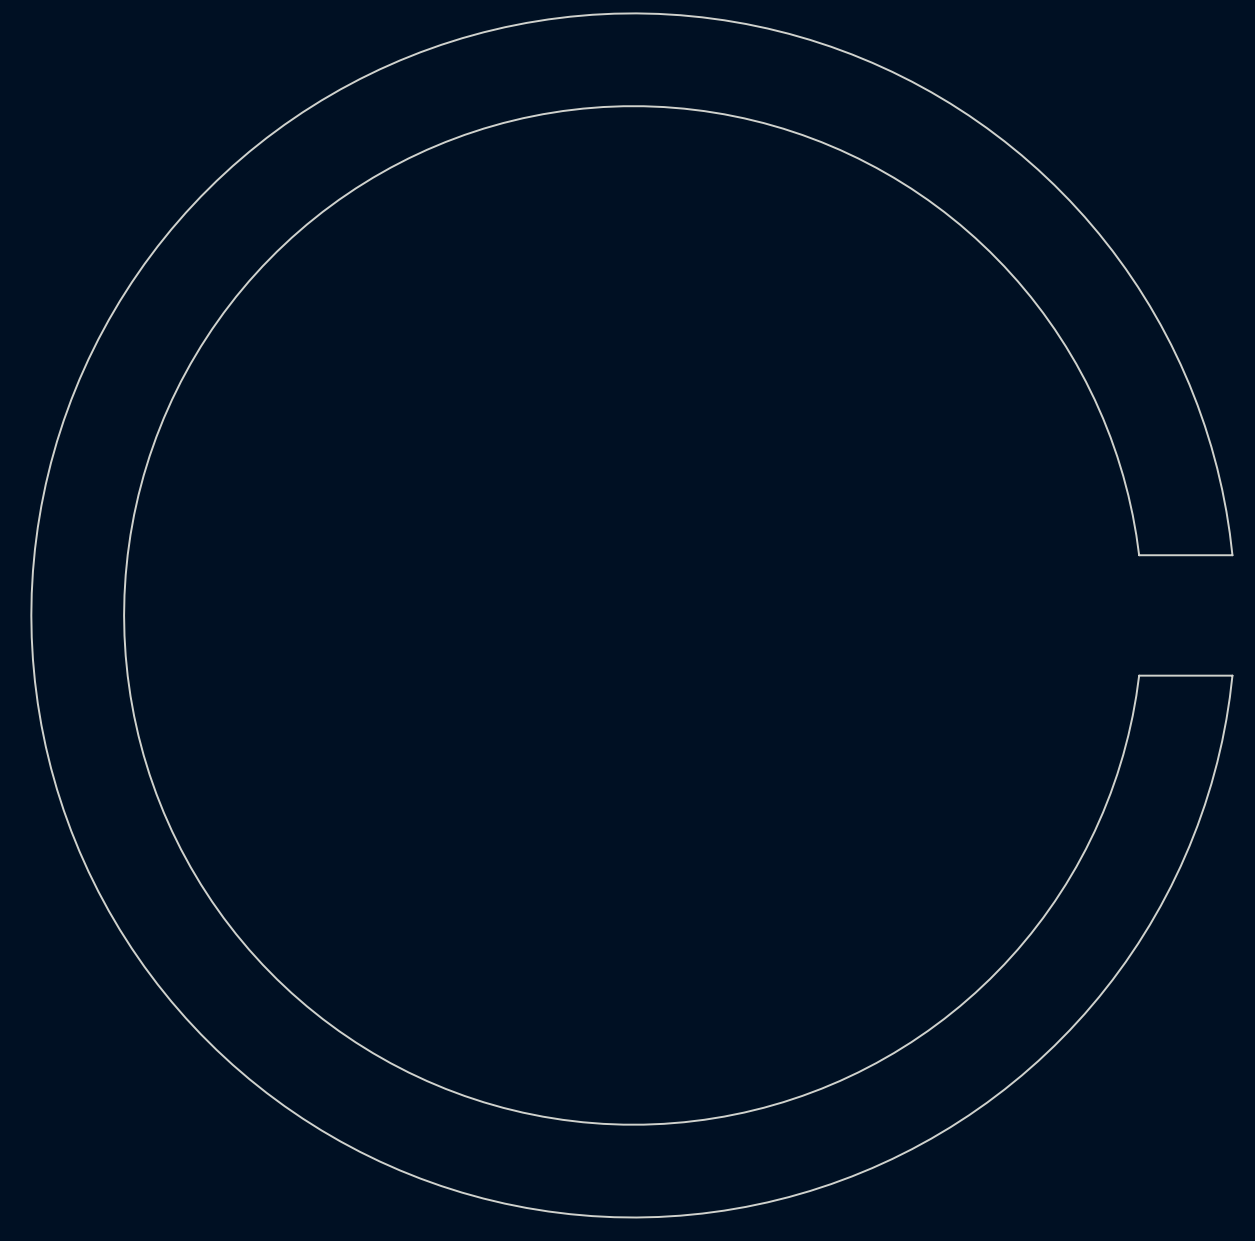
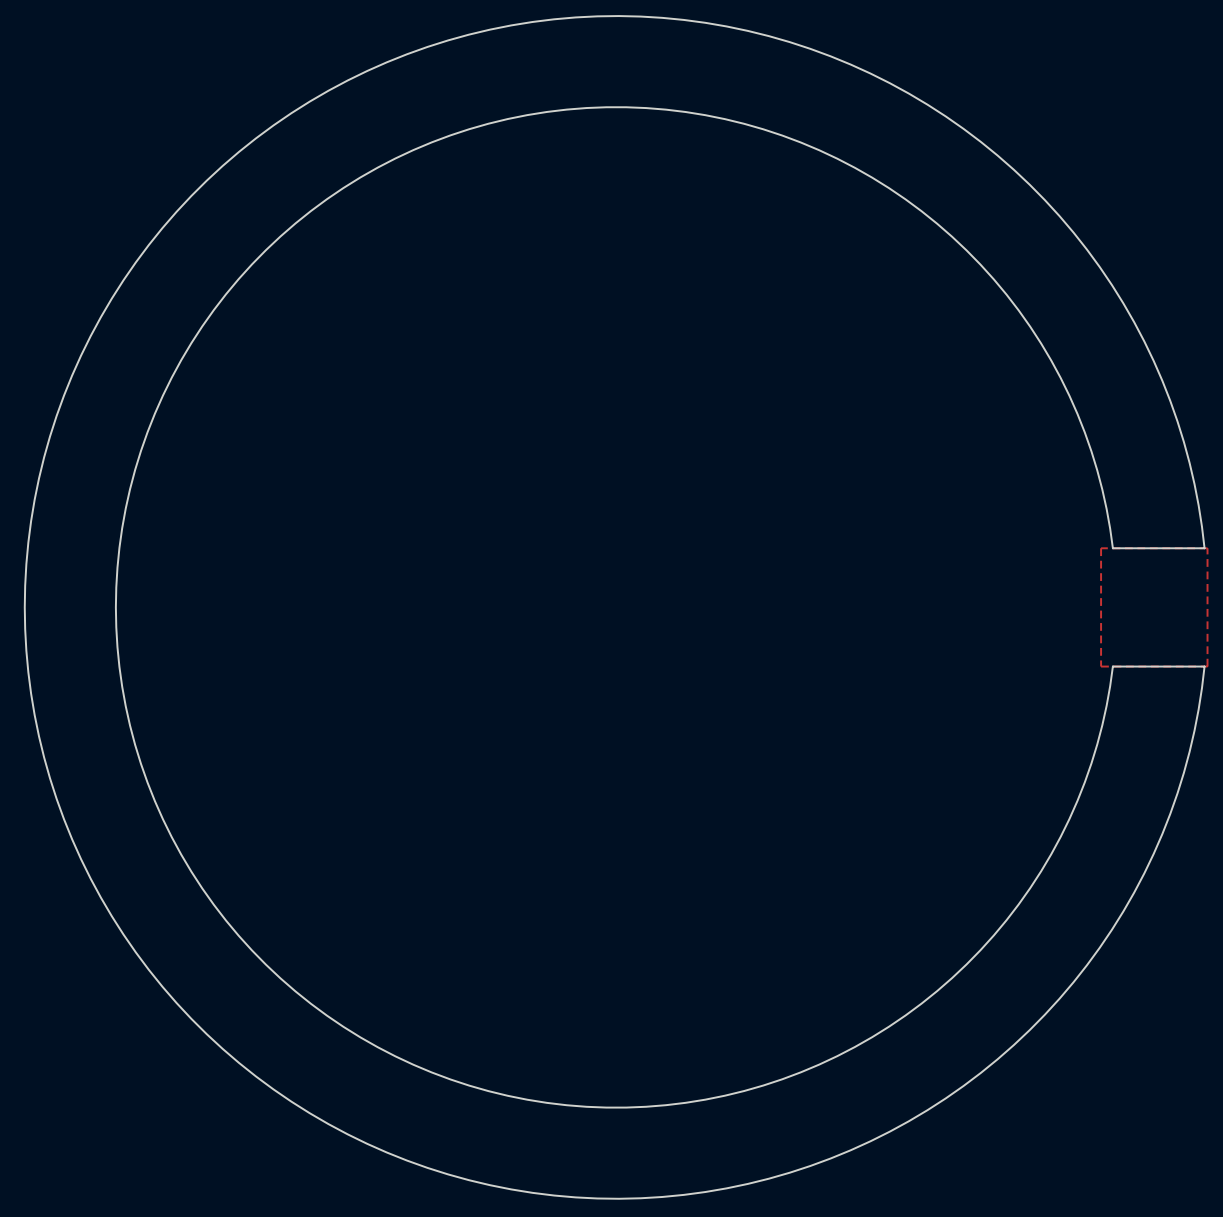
top zone outline: none -> (1101, 548) (1207, 548) (1207, 666) (1101, 666) (1101, 548)

